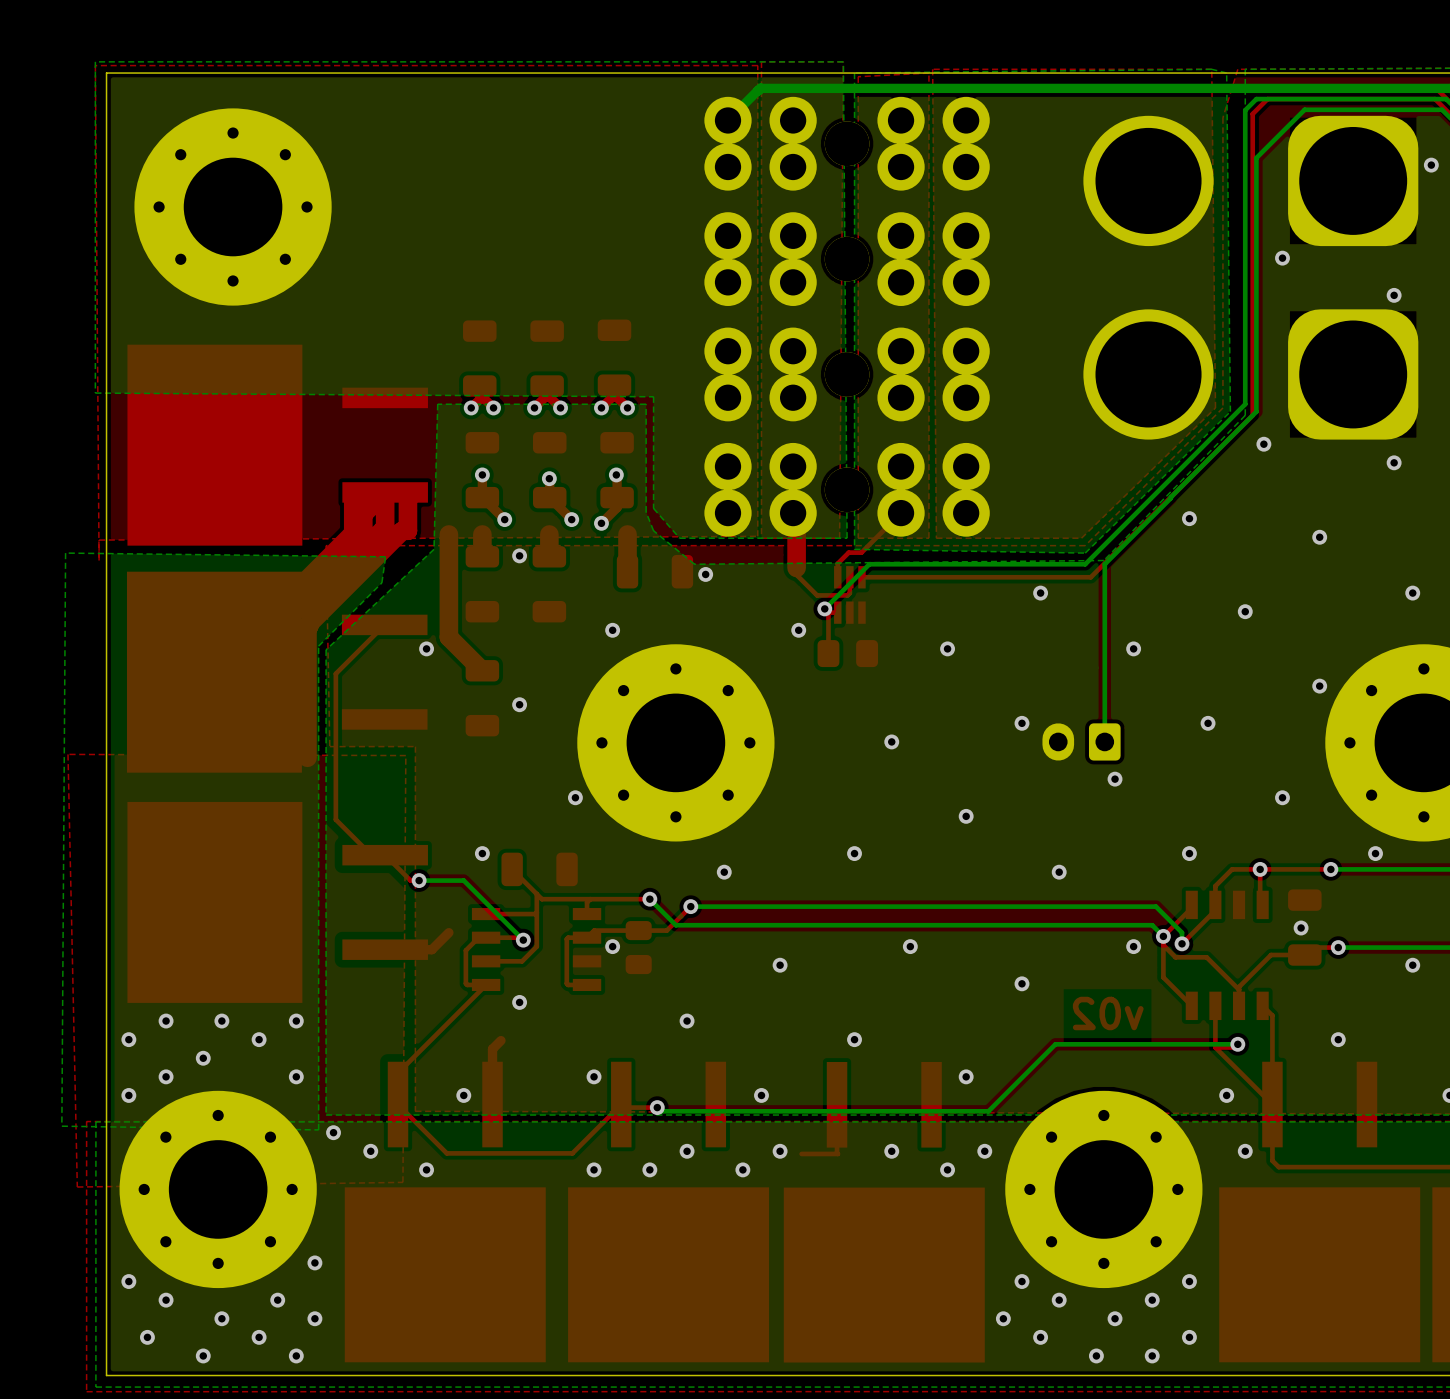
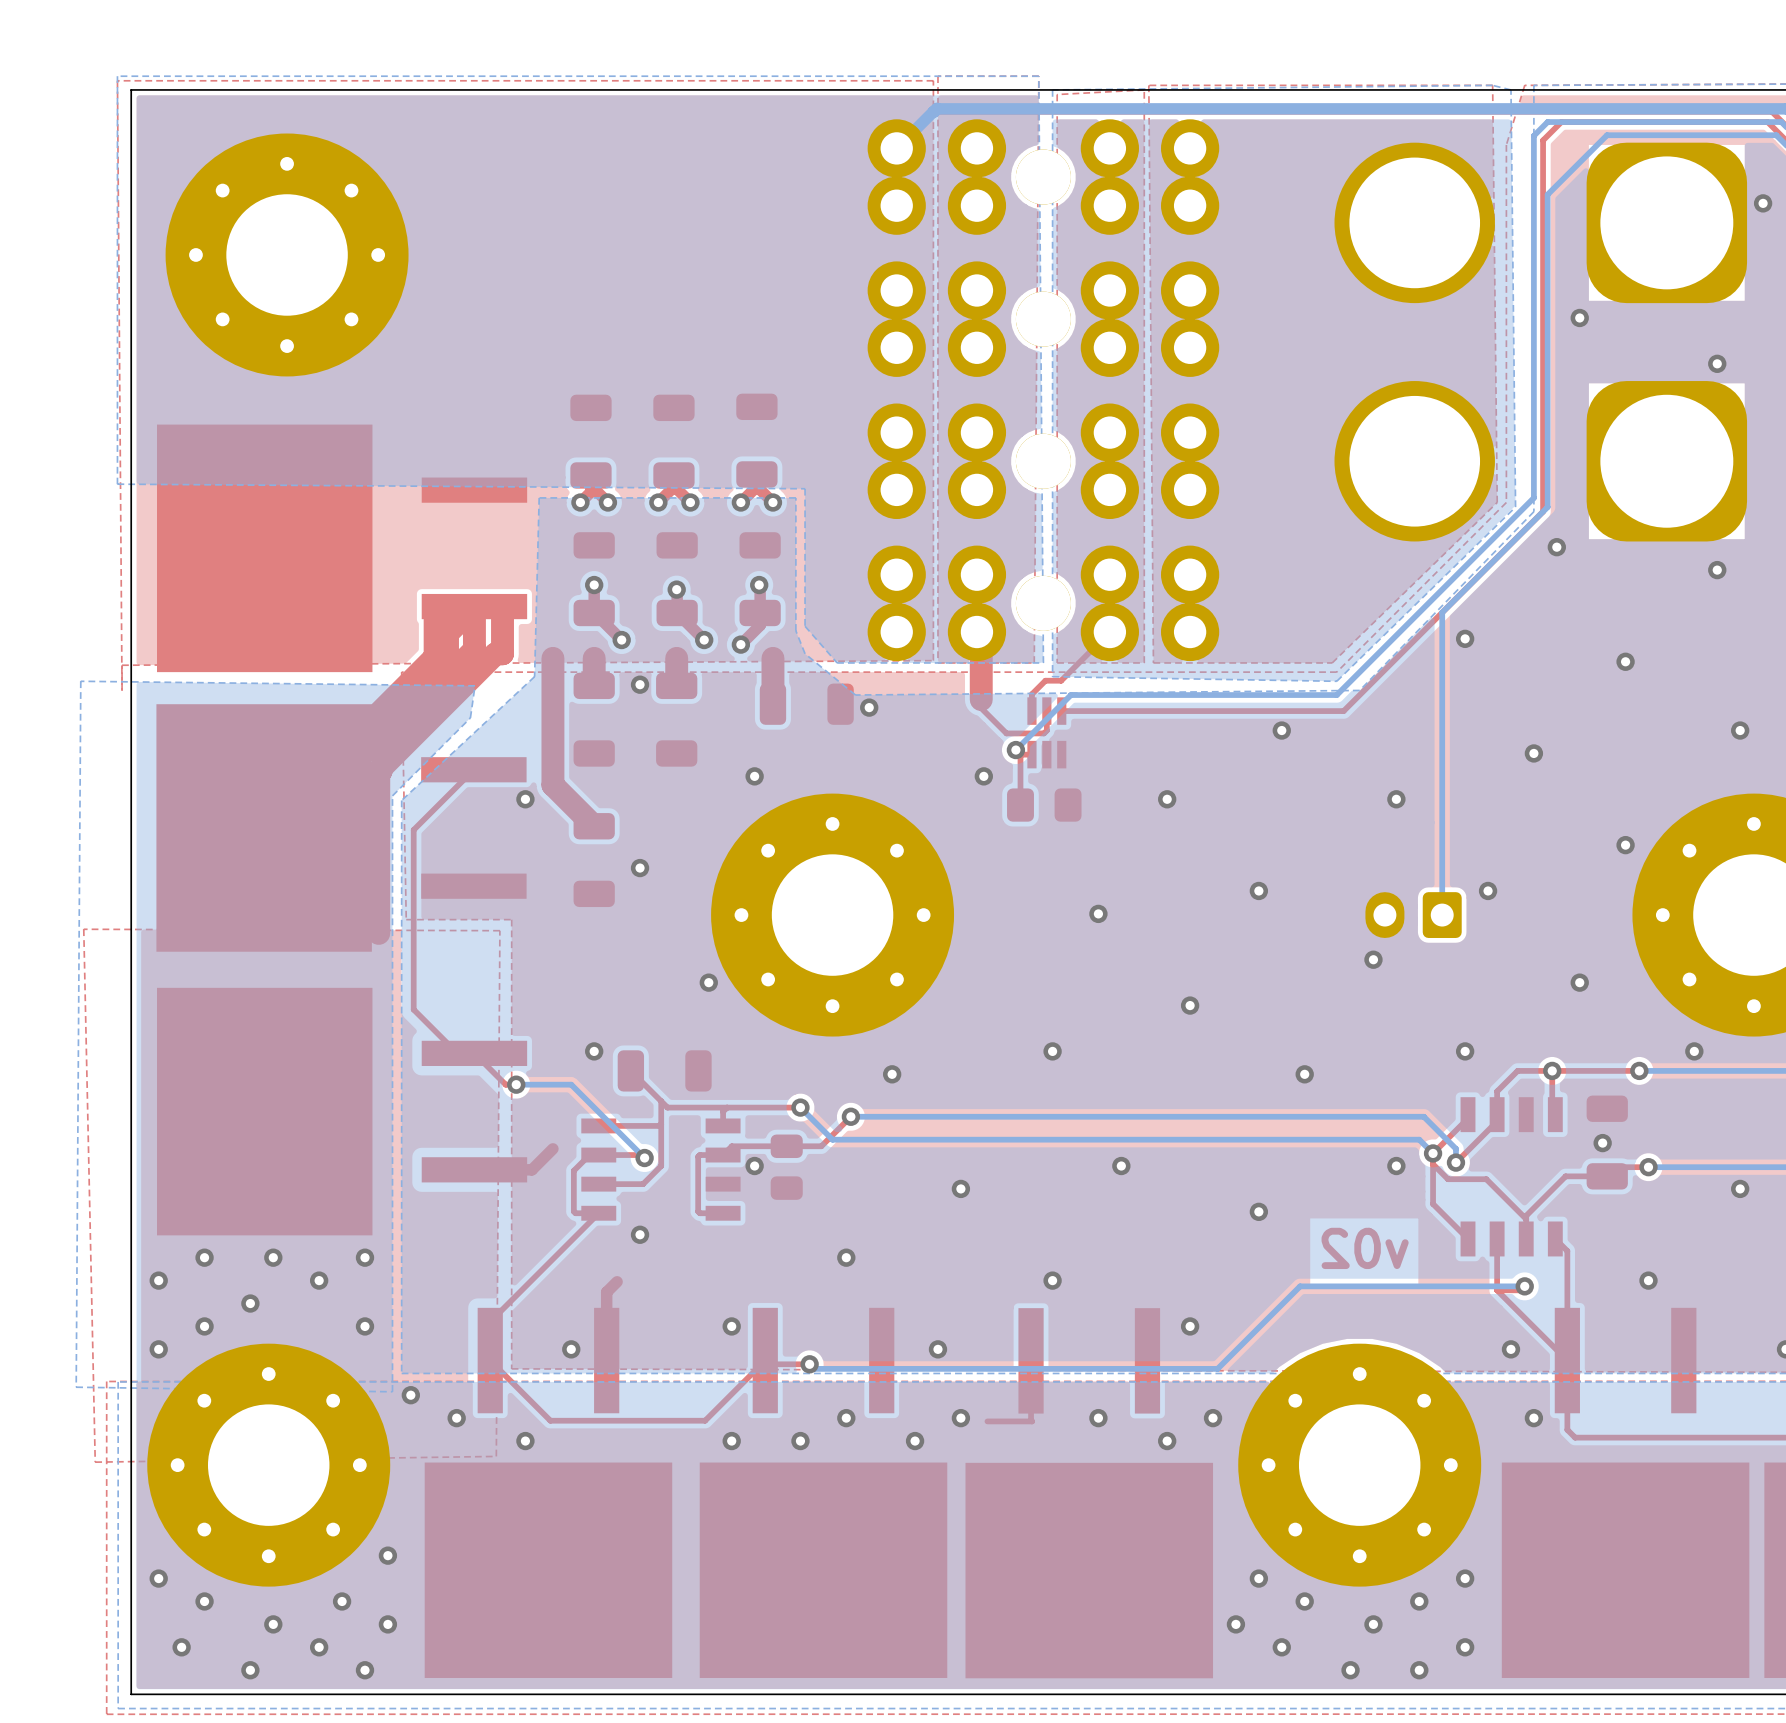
bottom track: (1170, 498) (1104, 564) (1104, 741) -> (1442, 613) (1442, 915)
part position: (1081, 741) -> (1413, 915)

